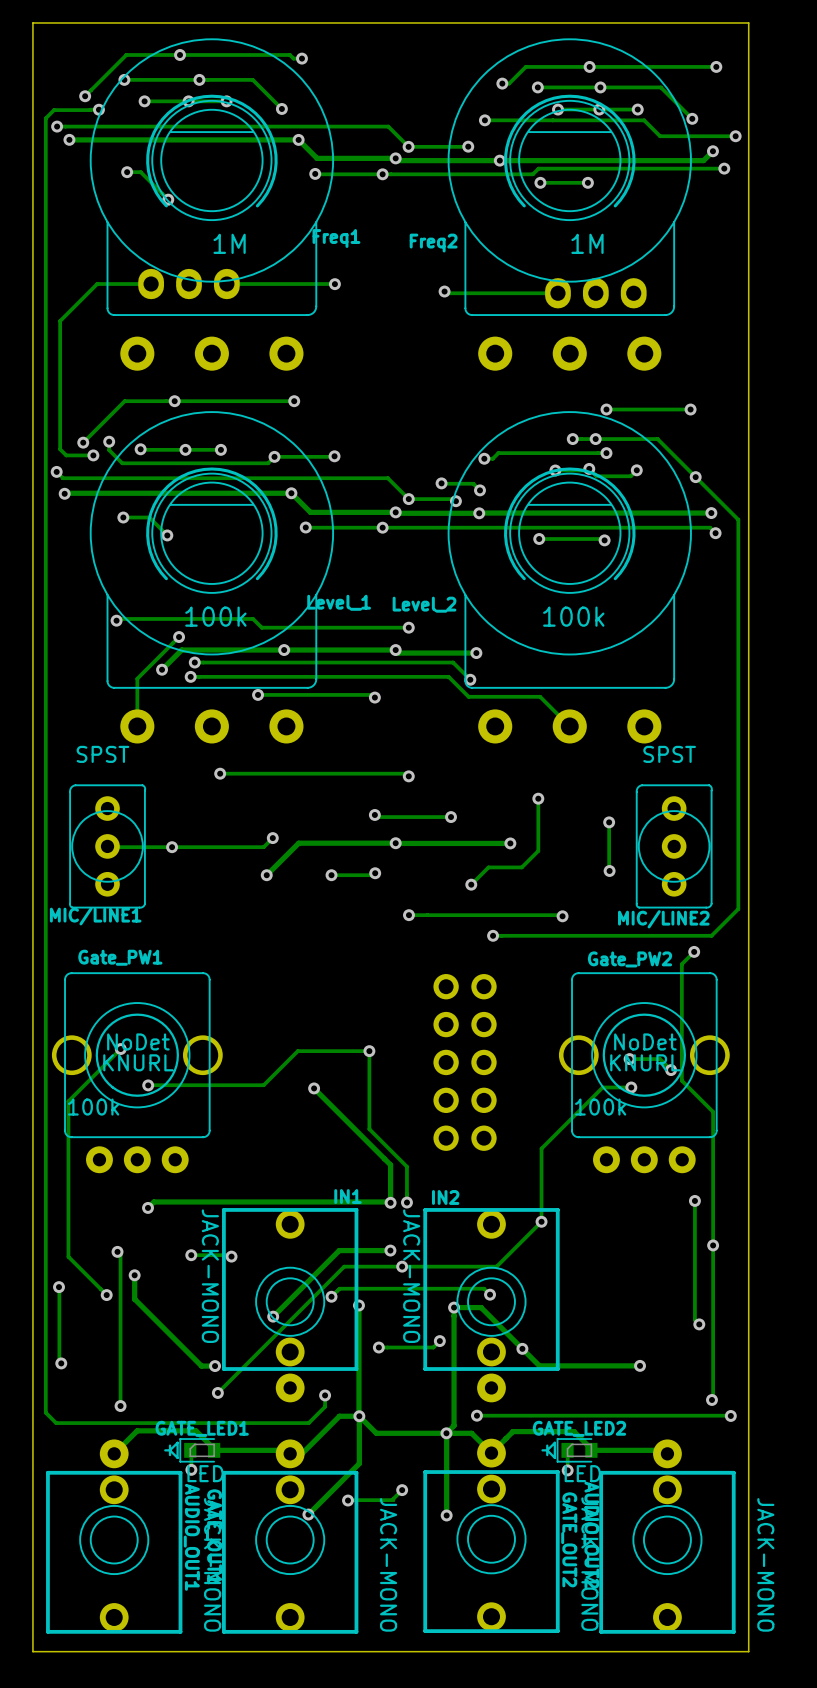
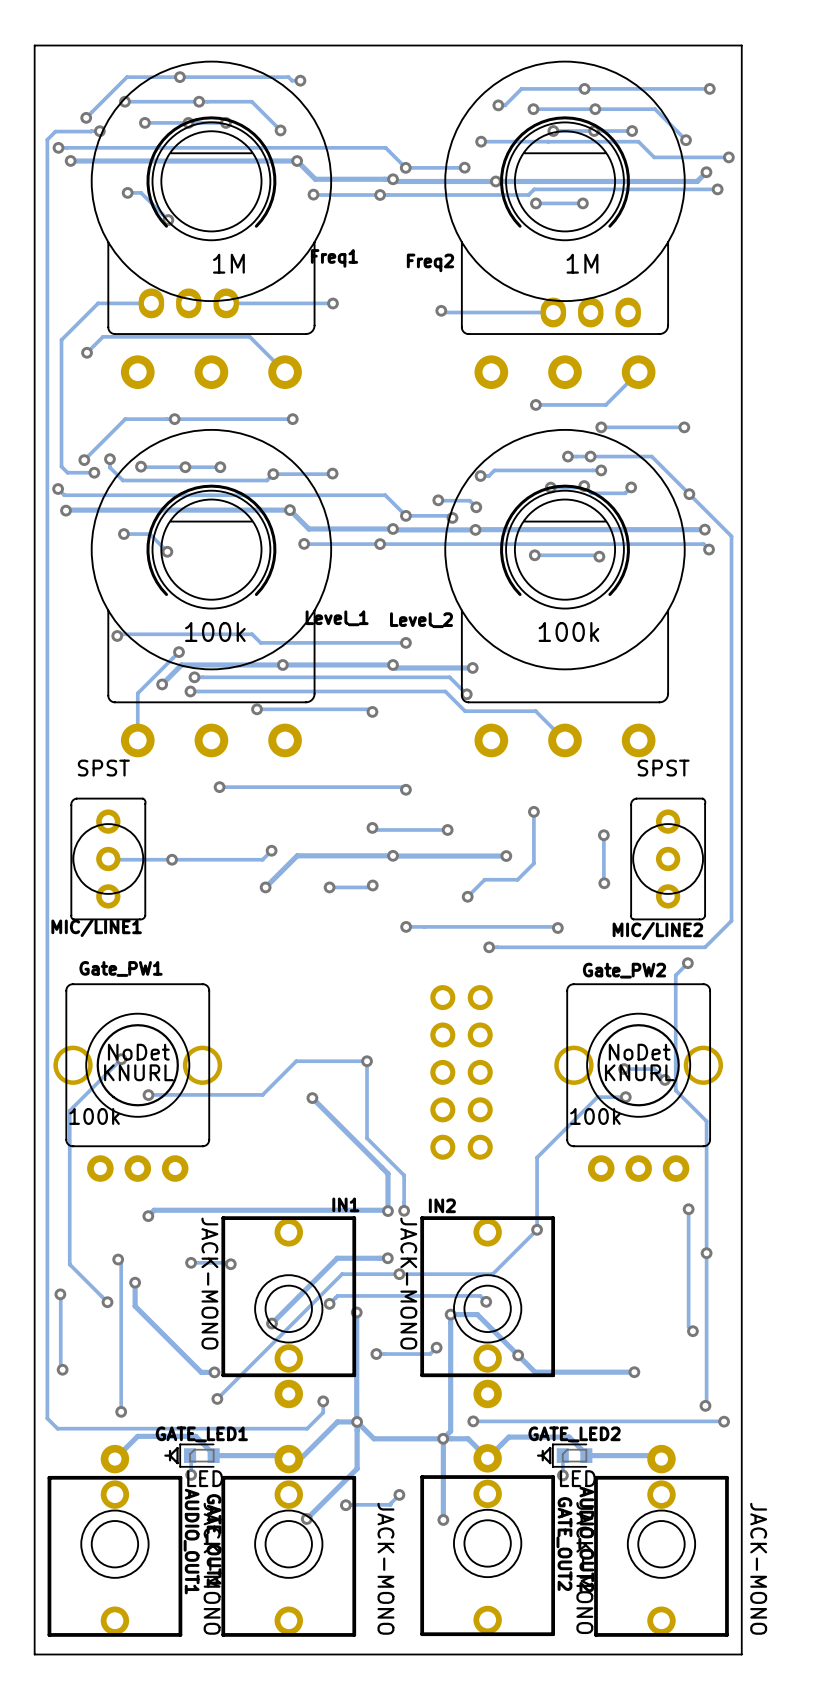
track: none -> (87, 352) (102, 336) (249, 336) (285, 372)
via: none -> (87, 352)
track: none -> (638, 372) (605, 404) (535, 404)
via: none -> (535, 404)

